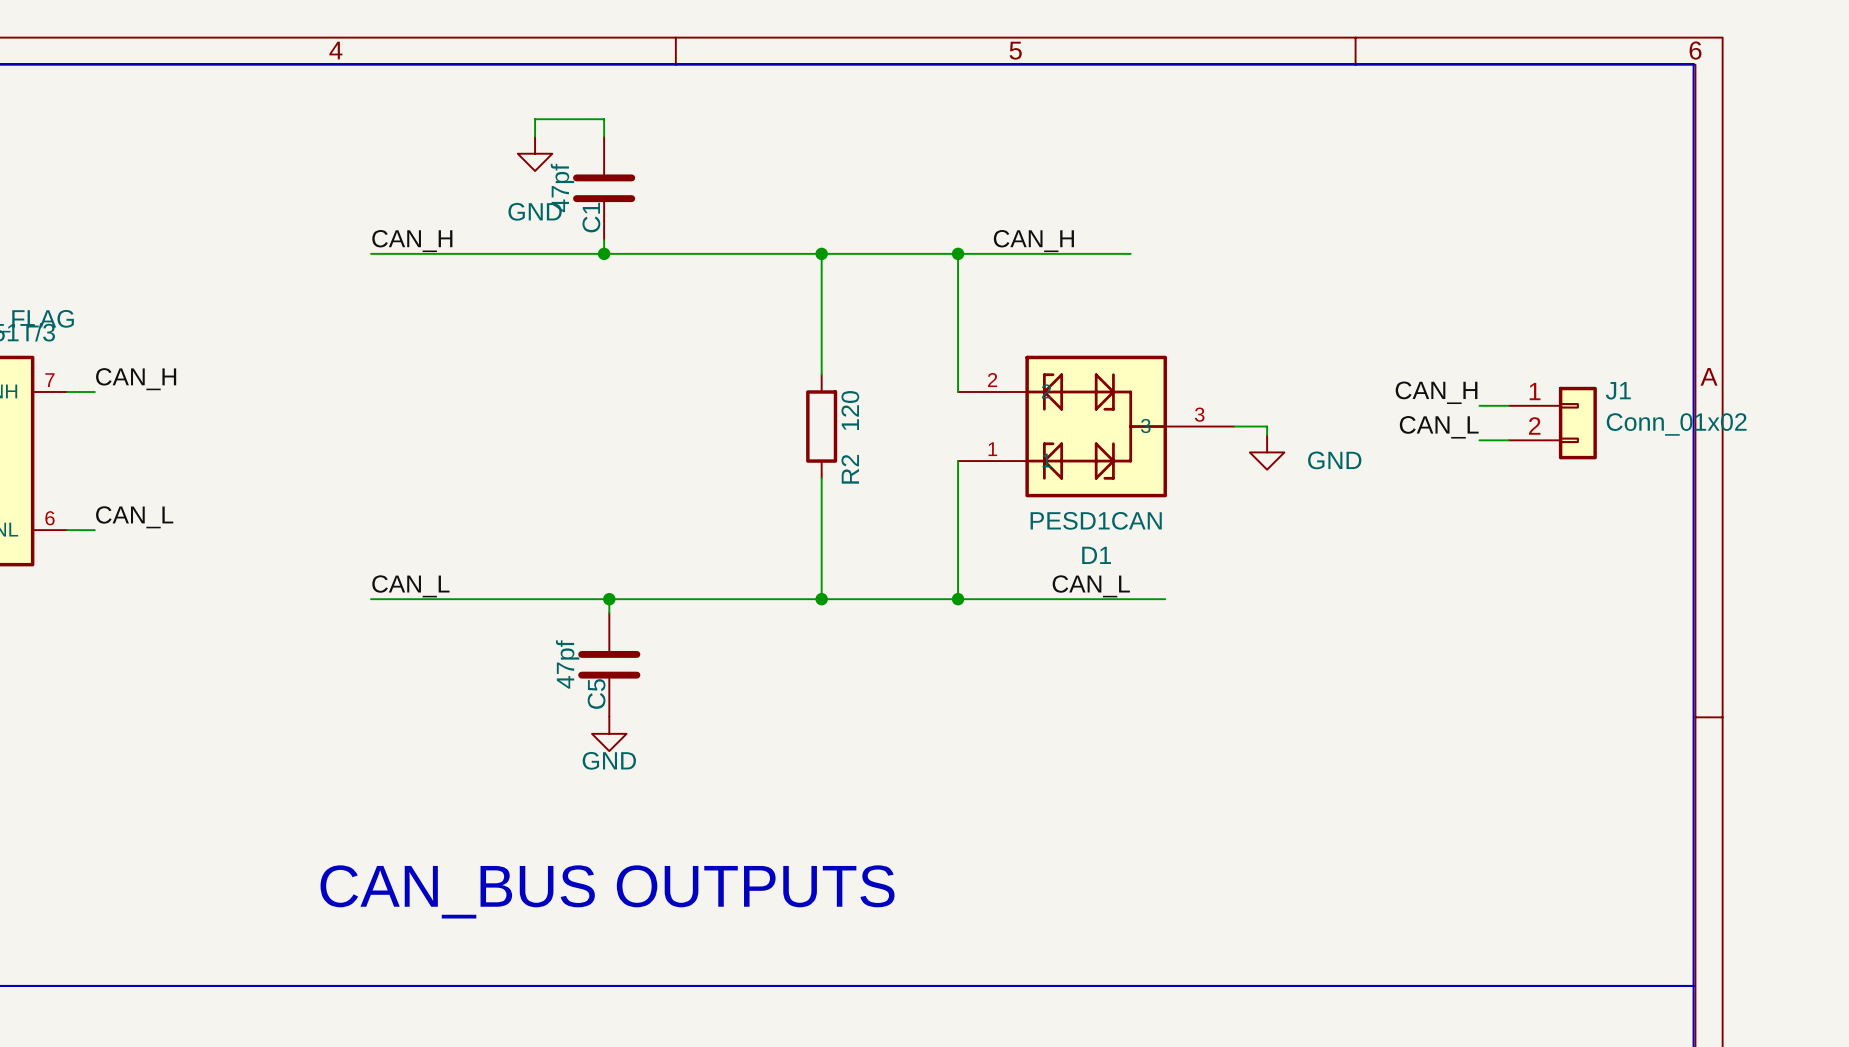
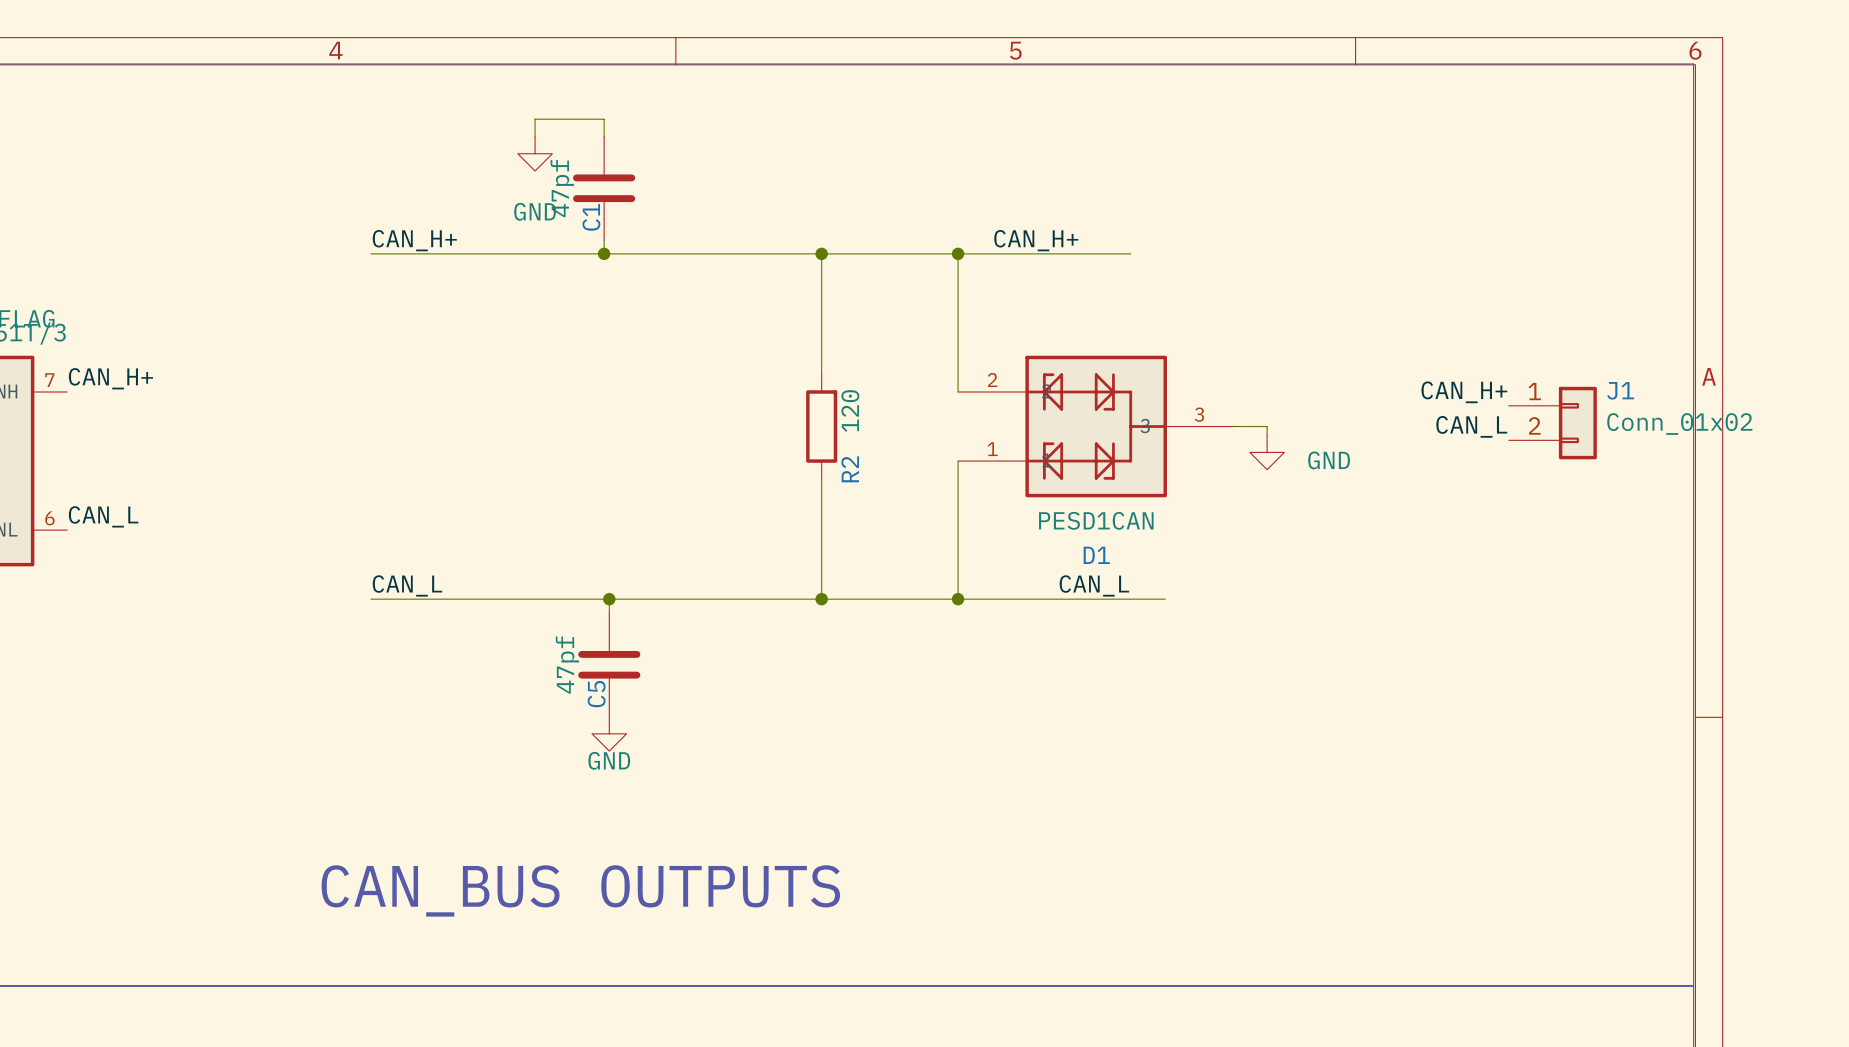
label: CAN_H (412, 241) -> CAN_H+ (414, 240)
label: CAN_H (1033, 241) -> CAN_H+ (1036, 240)
label: CAN_H (136, 379) -> CAN_H+ (110, 378)
wire: (67, 391) (94, 391) -> none
label: CAN_H (1436, 392) -> CAN_H+ (1464, 392)
wire: (1479, 405) (1508, 405) -> none
label position: CAN_L (1439, 427) -> CAN_L (1471, 426)
wire: (1479, 440) (1508, 440) -> none
label position: CAN_L (134, 517) -> CAN_L (103, 516)
wire: (67, 530) (94, 530) -> none

